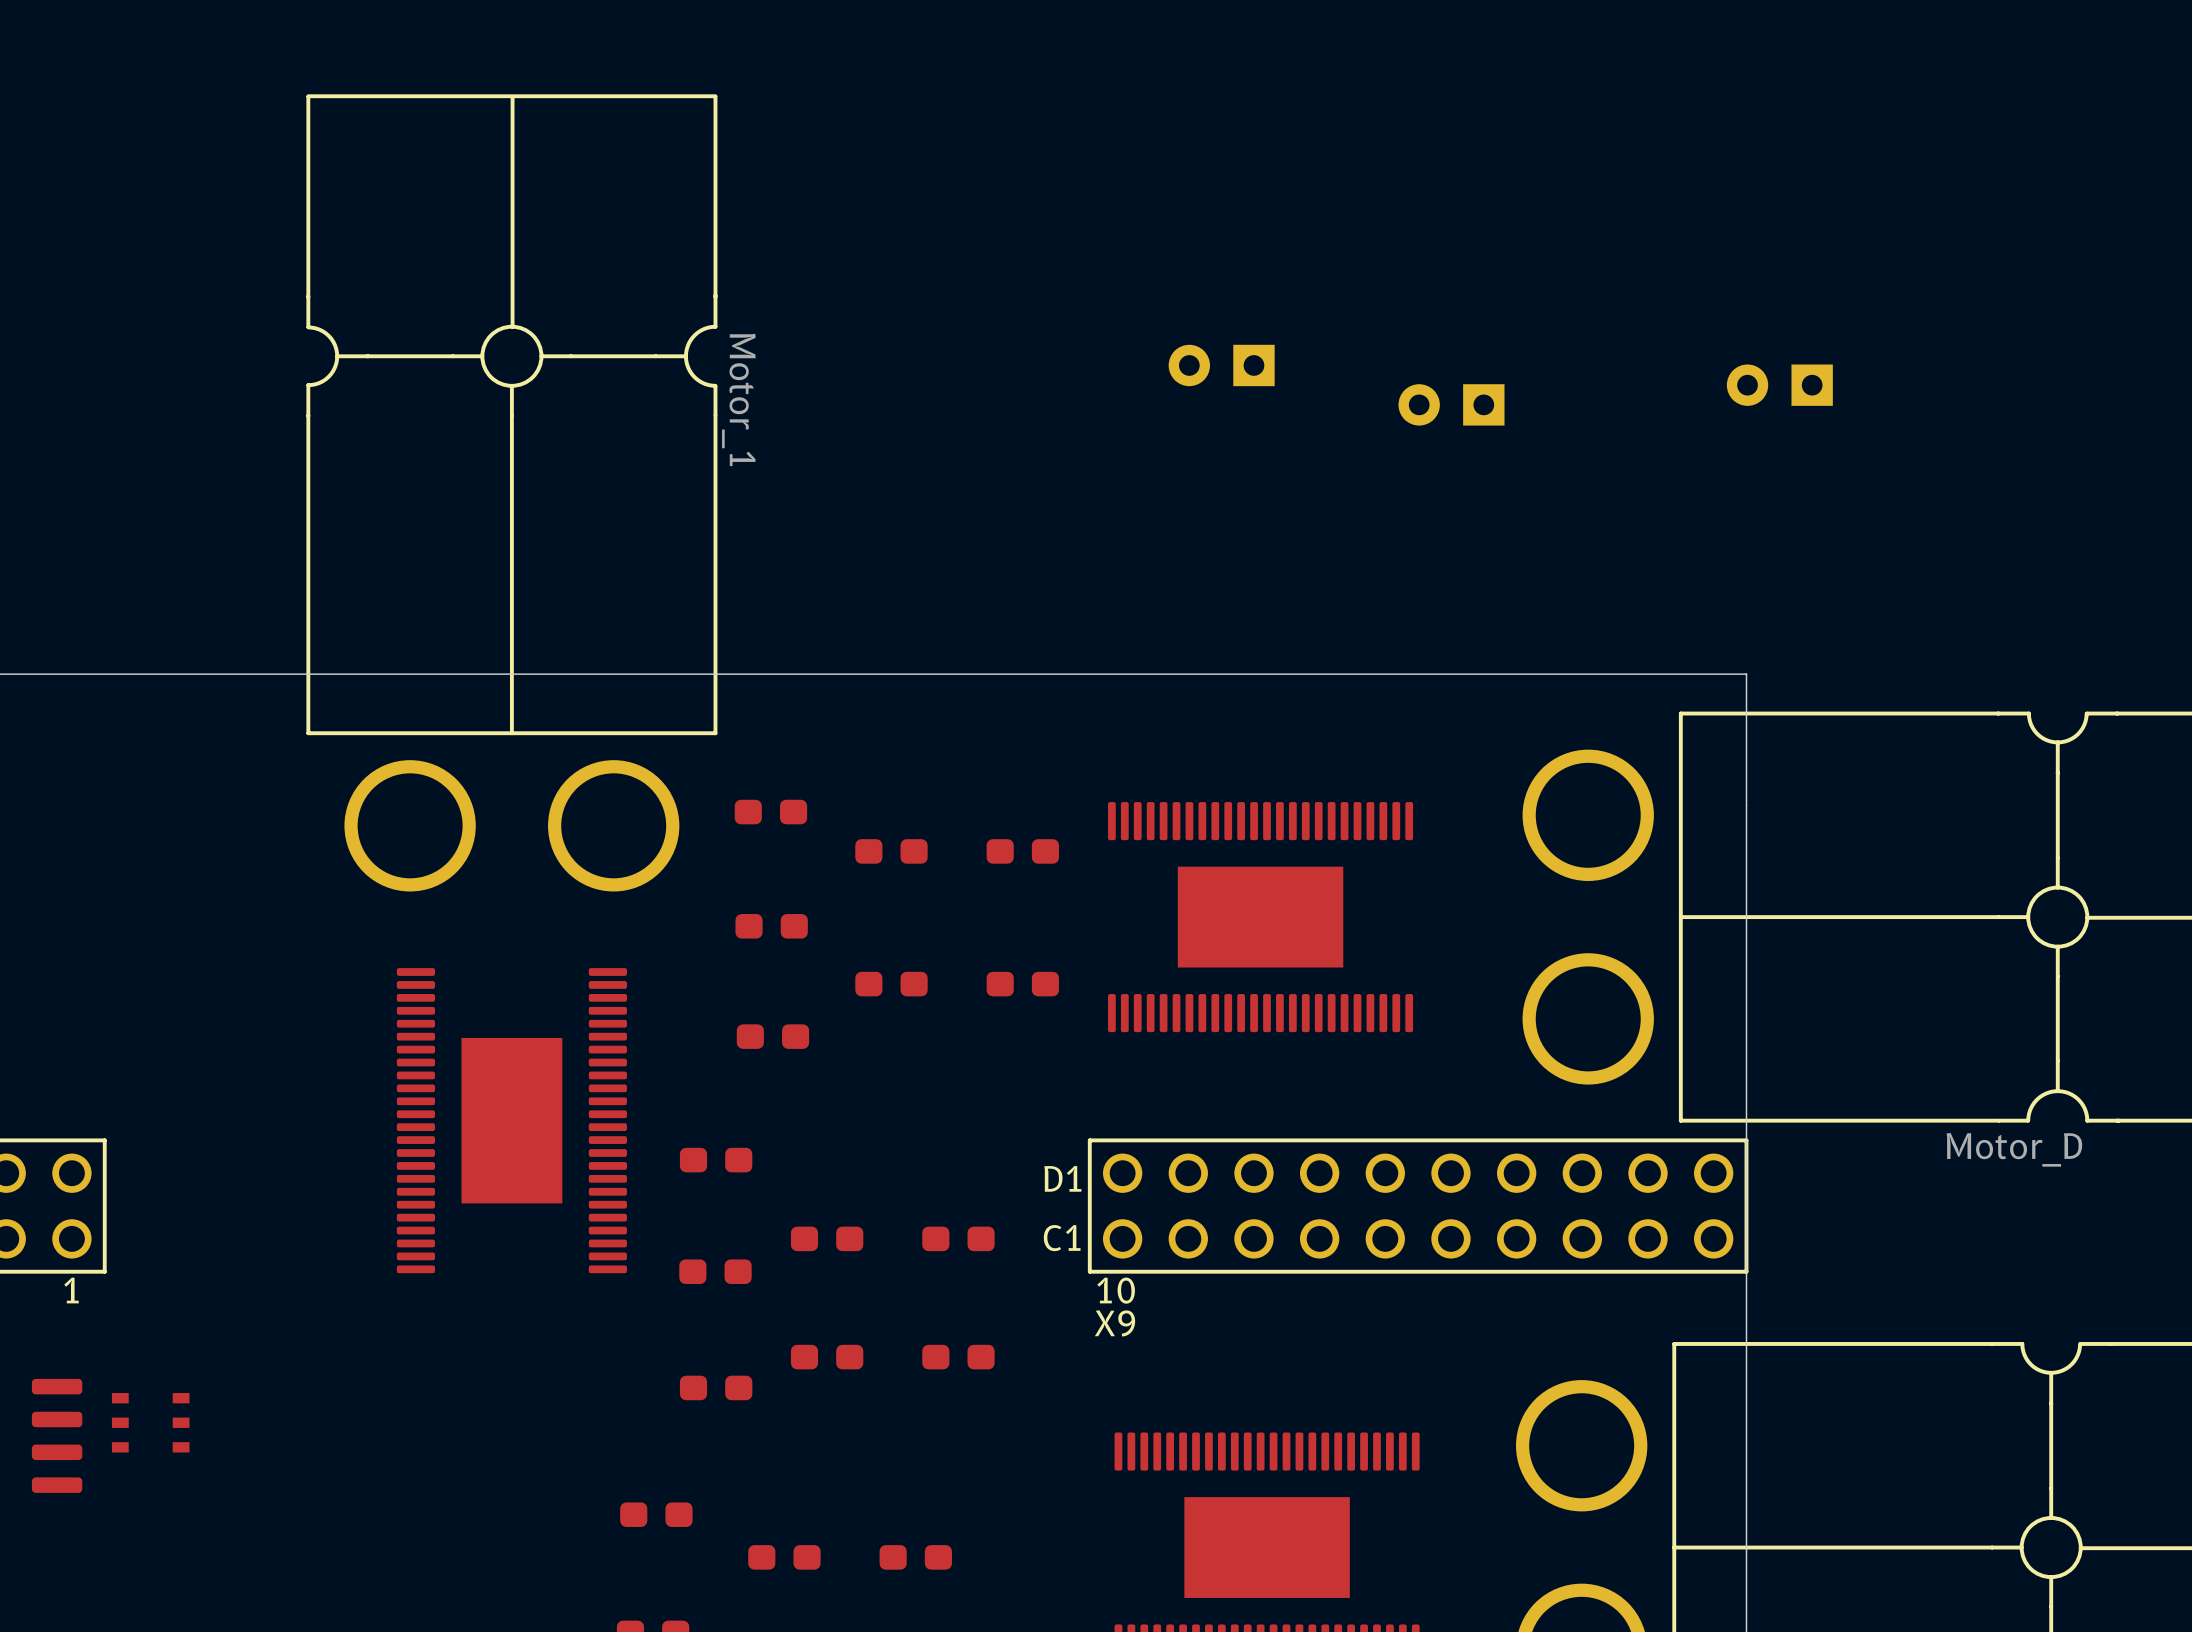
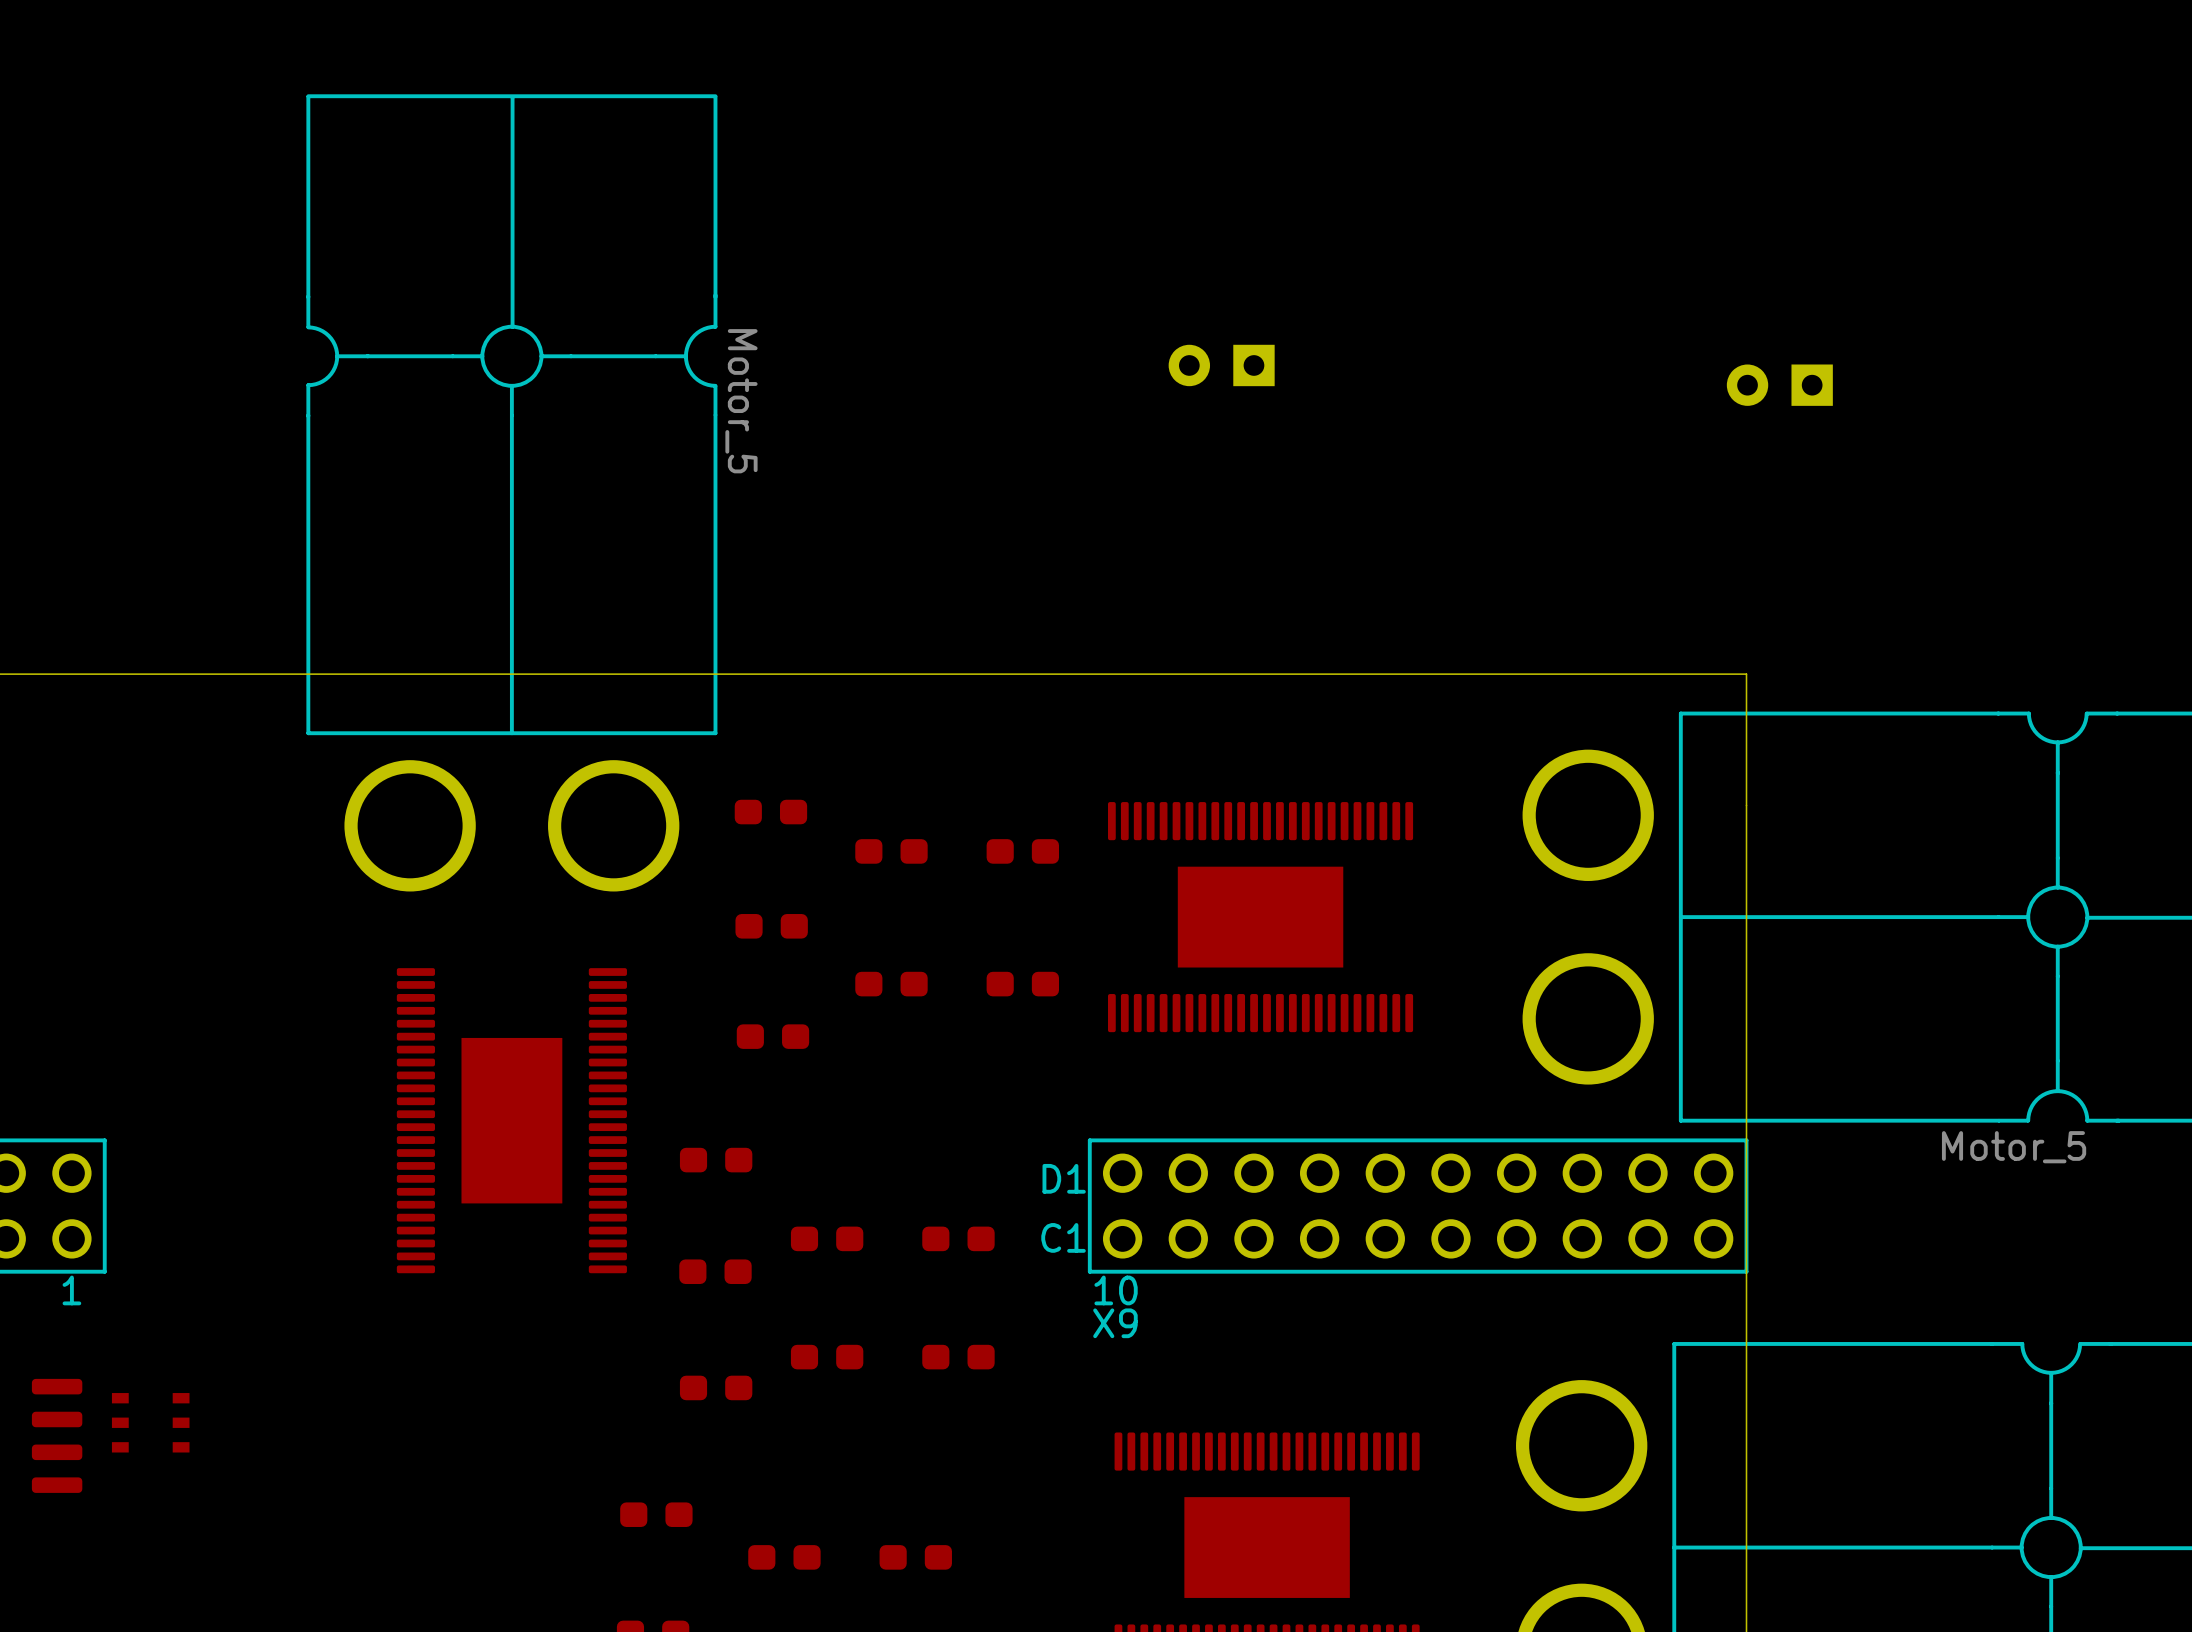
part value: Motor_1 (738, 399) -> Motor_5 (741, 401)
part: (1451, 404) -> none
part value: Motor_D (2014, 1149) -> Motor_5 (2014, 1147)

